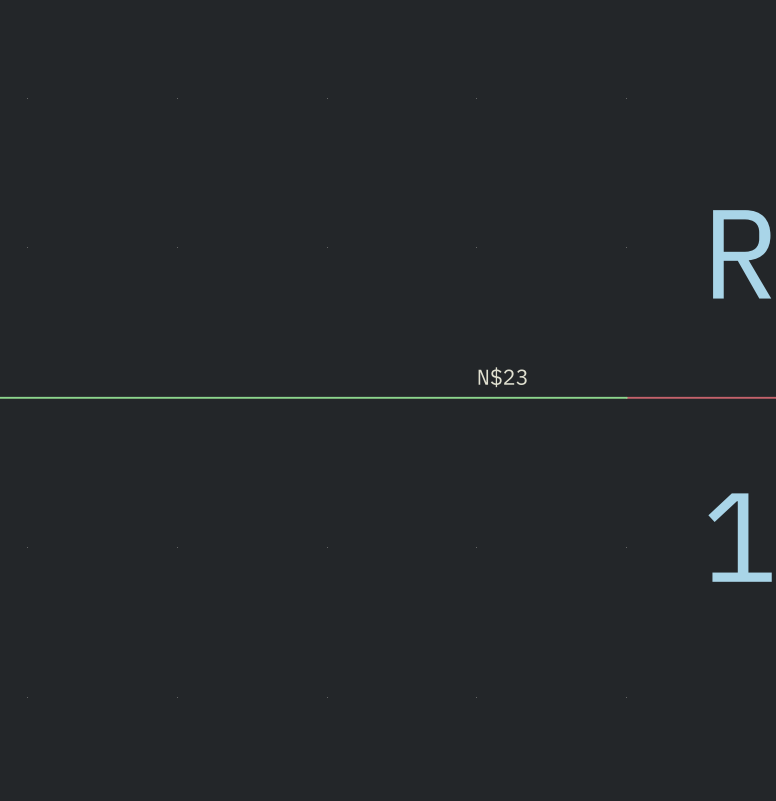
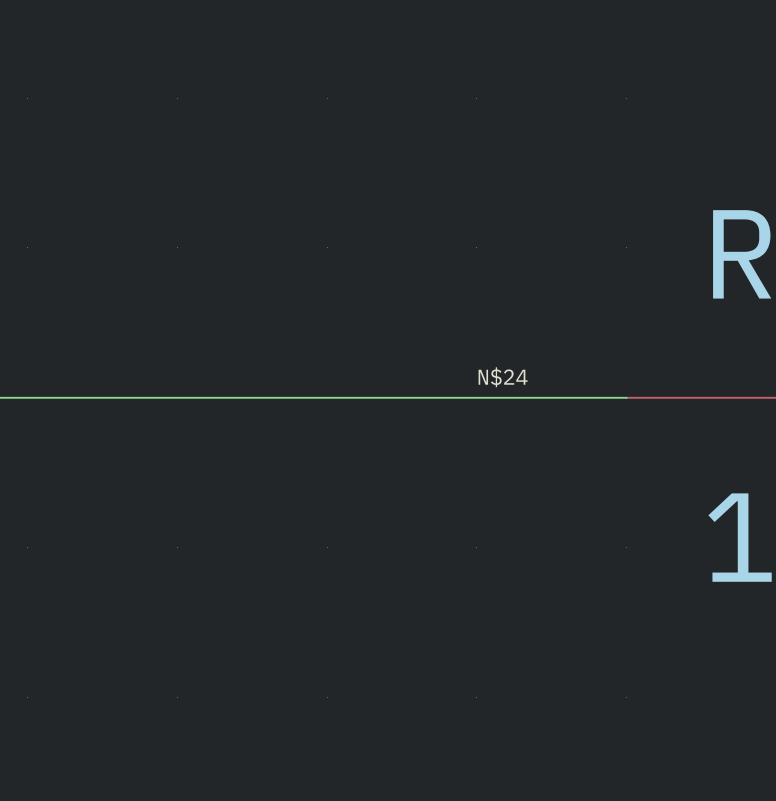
label: N$23 (502, 377) -> N$24 (503, 377)

